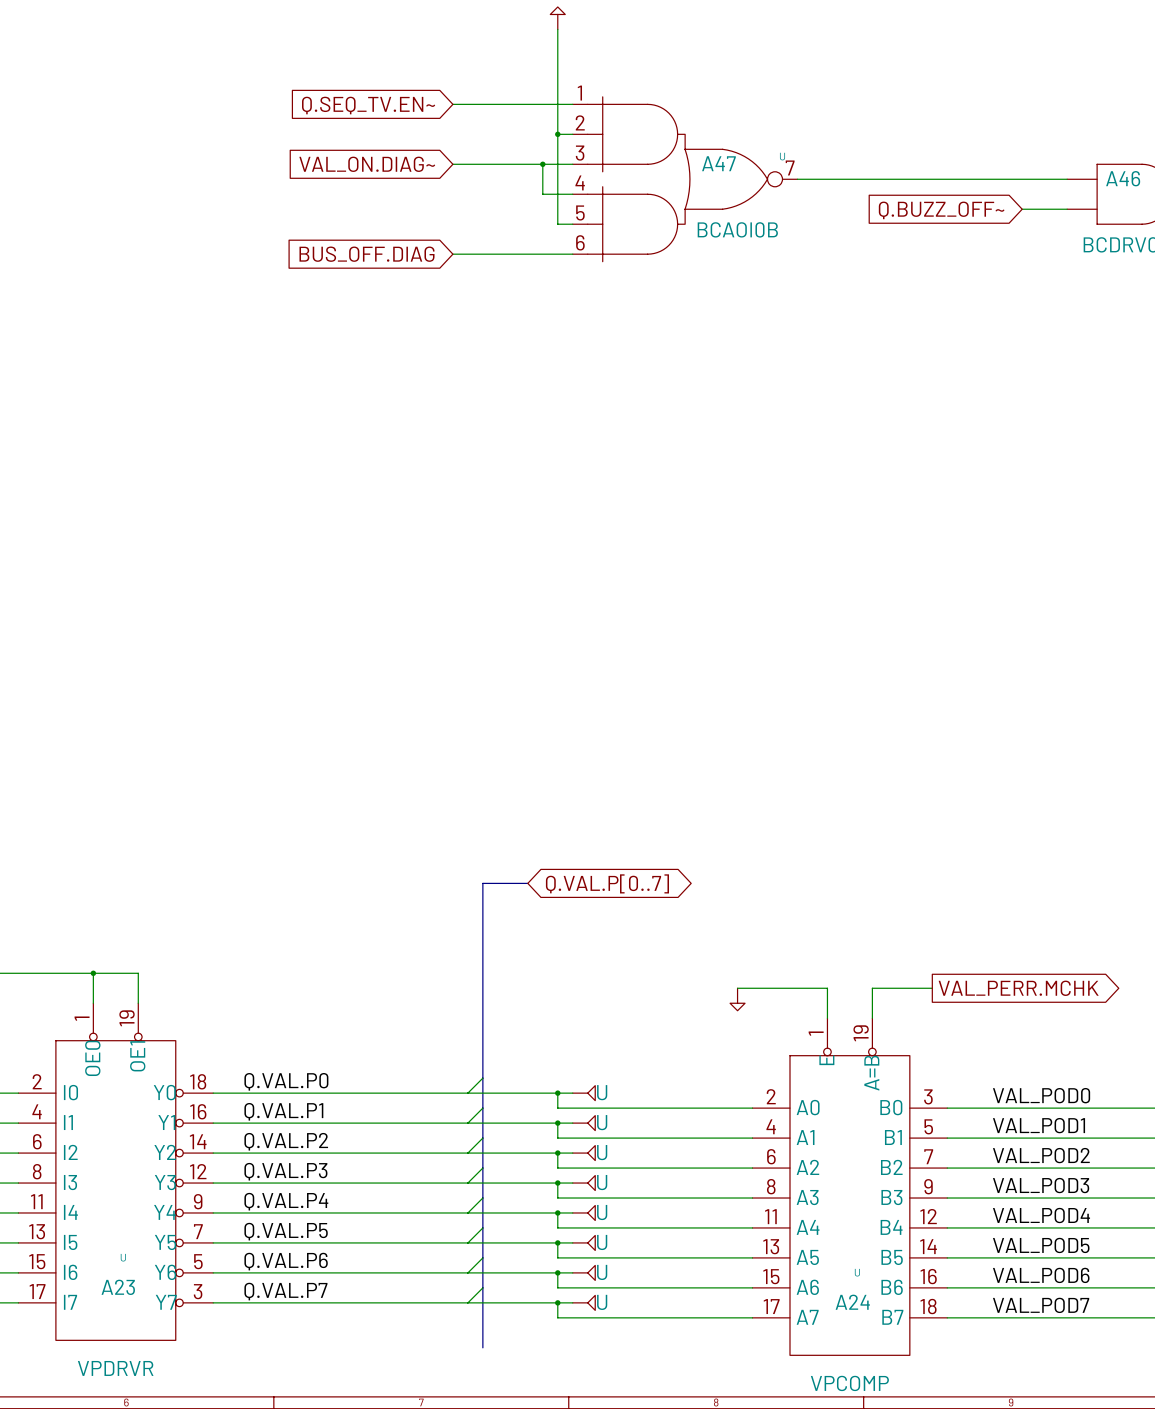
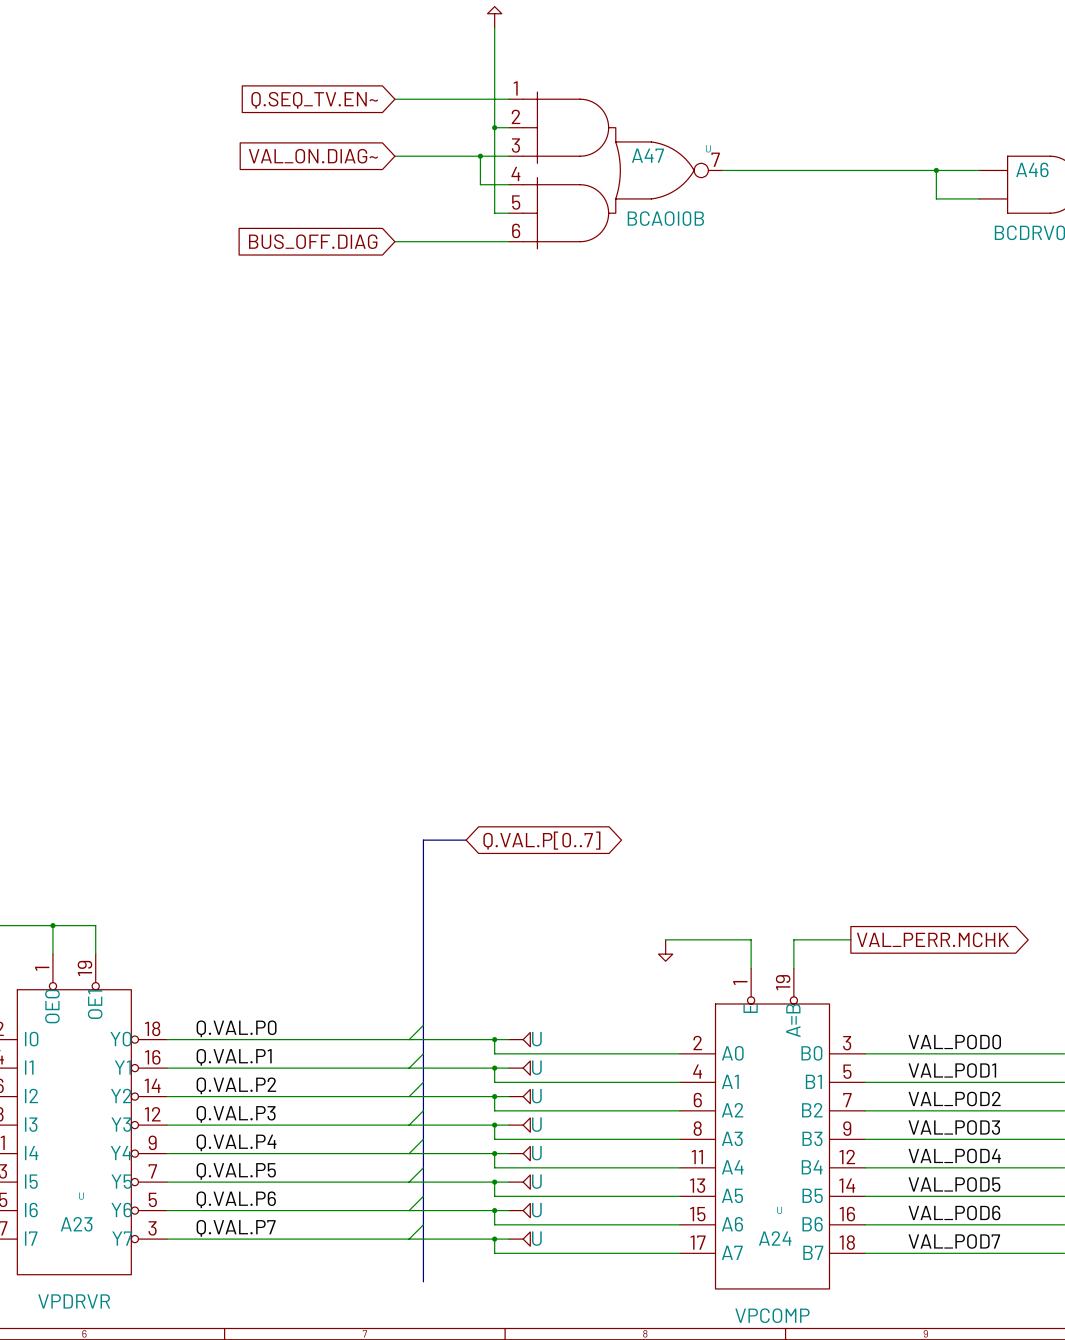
wire: none -> (936, 170) (936, 198)
junction: none -> (936, 170)
global label: Q.BUZZ_OFF~ (941, 210) -> none

